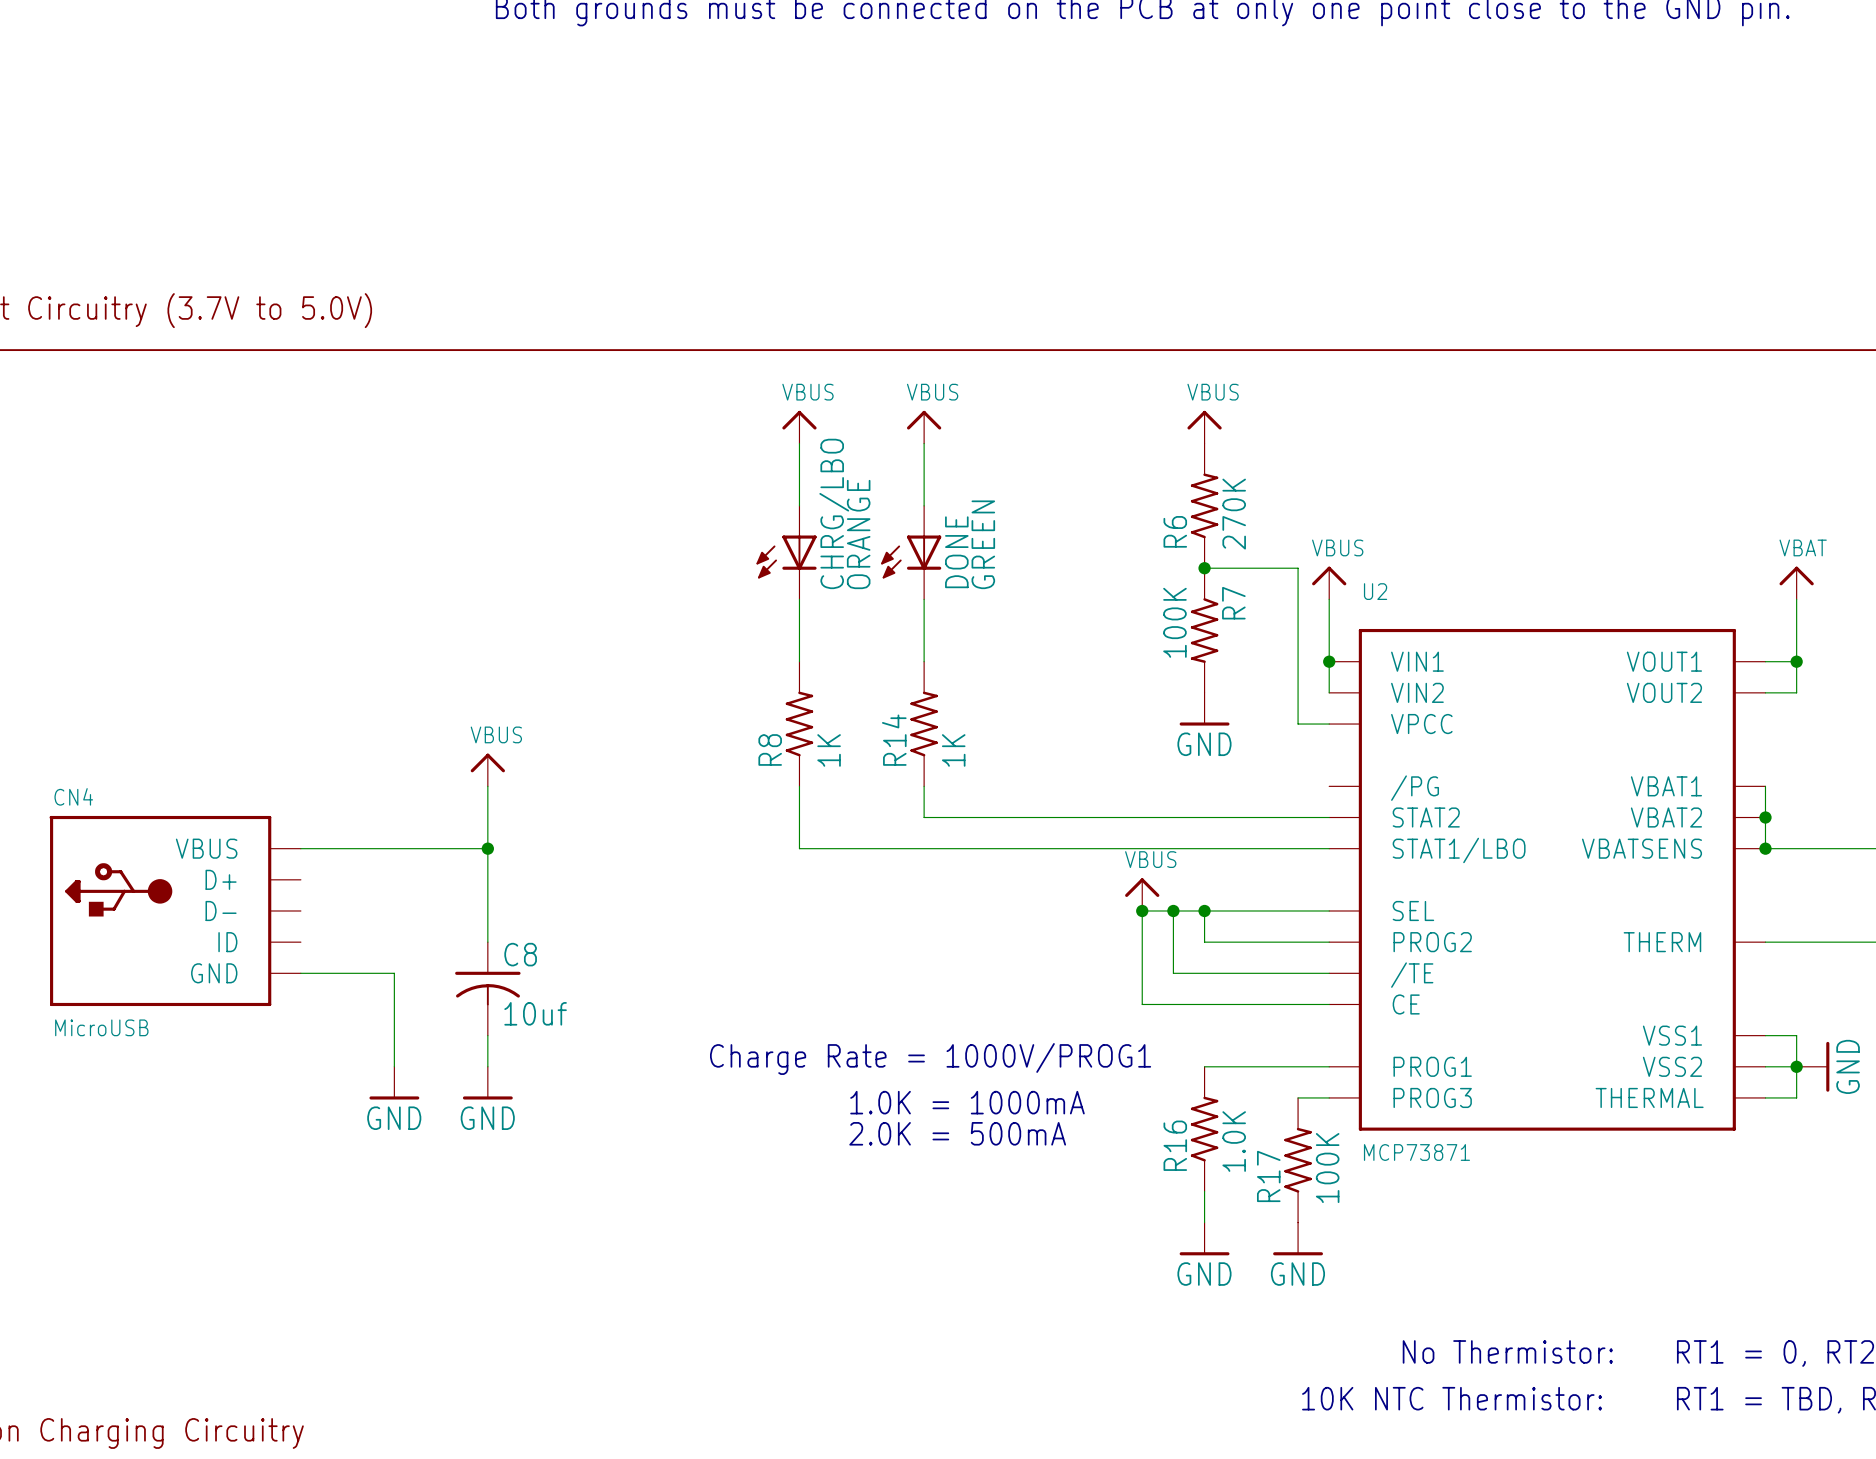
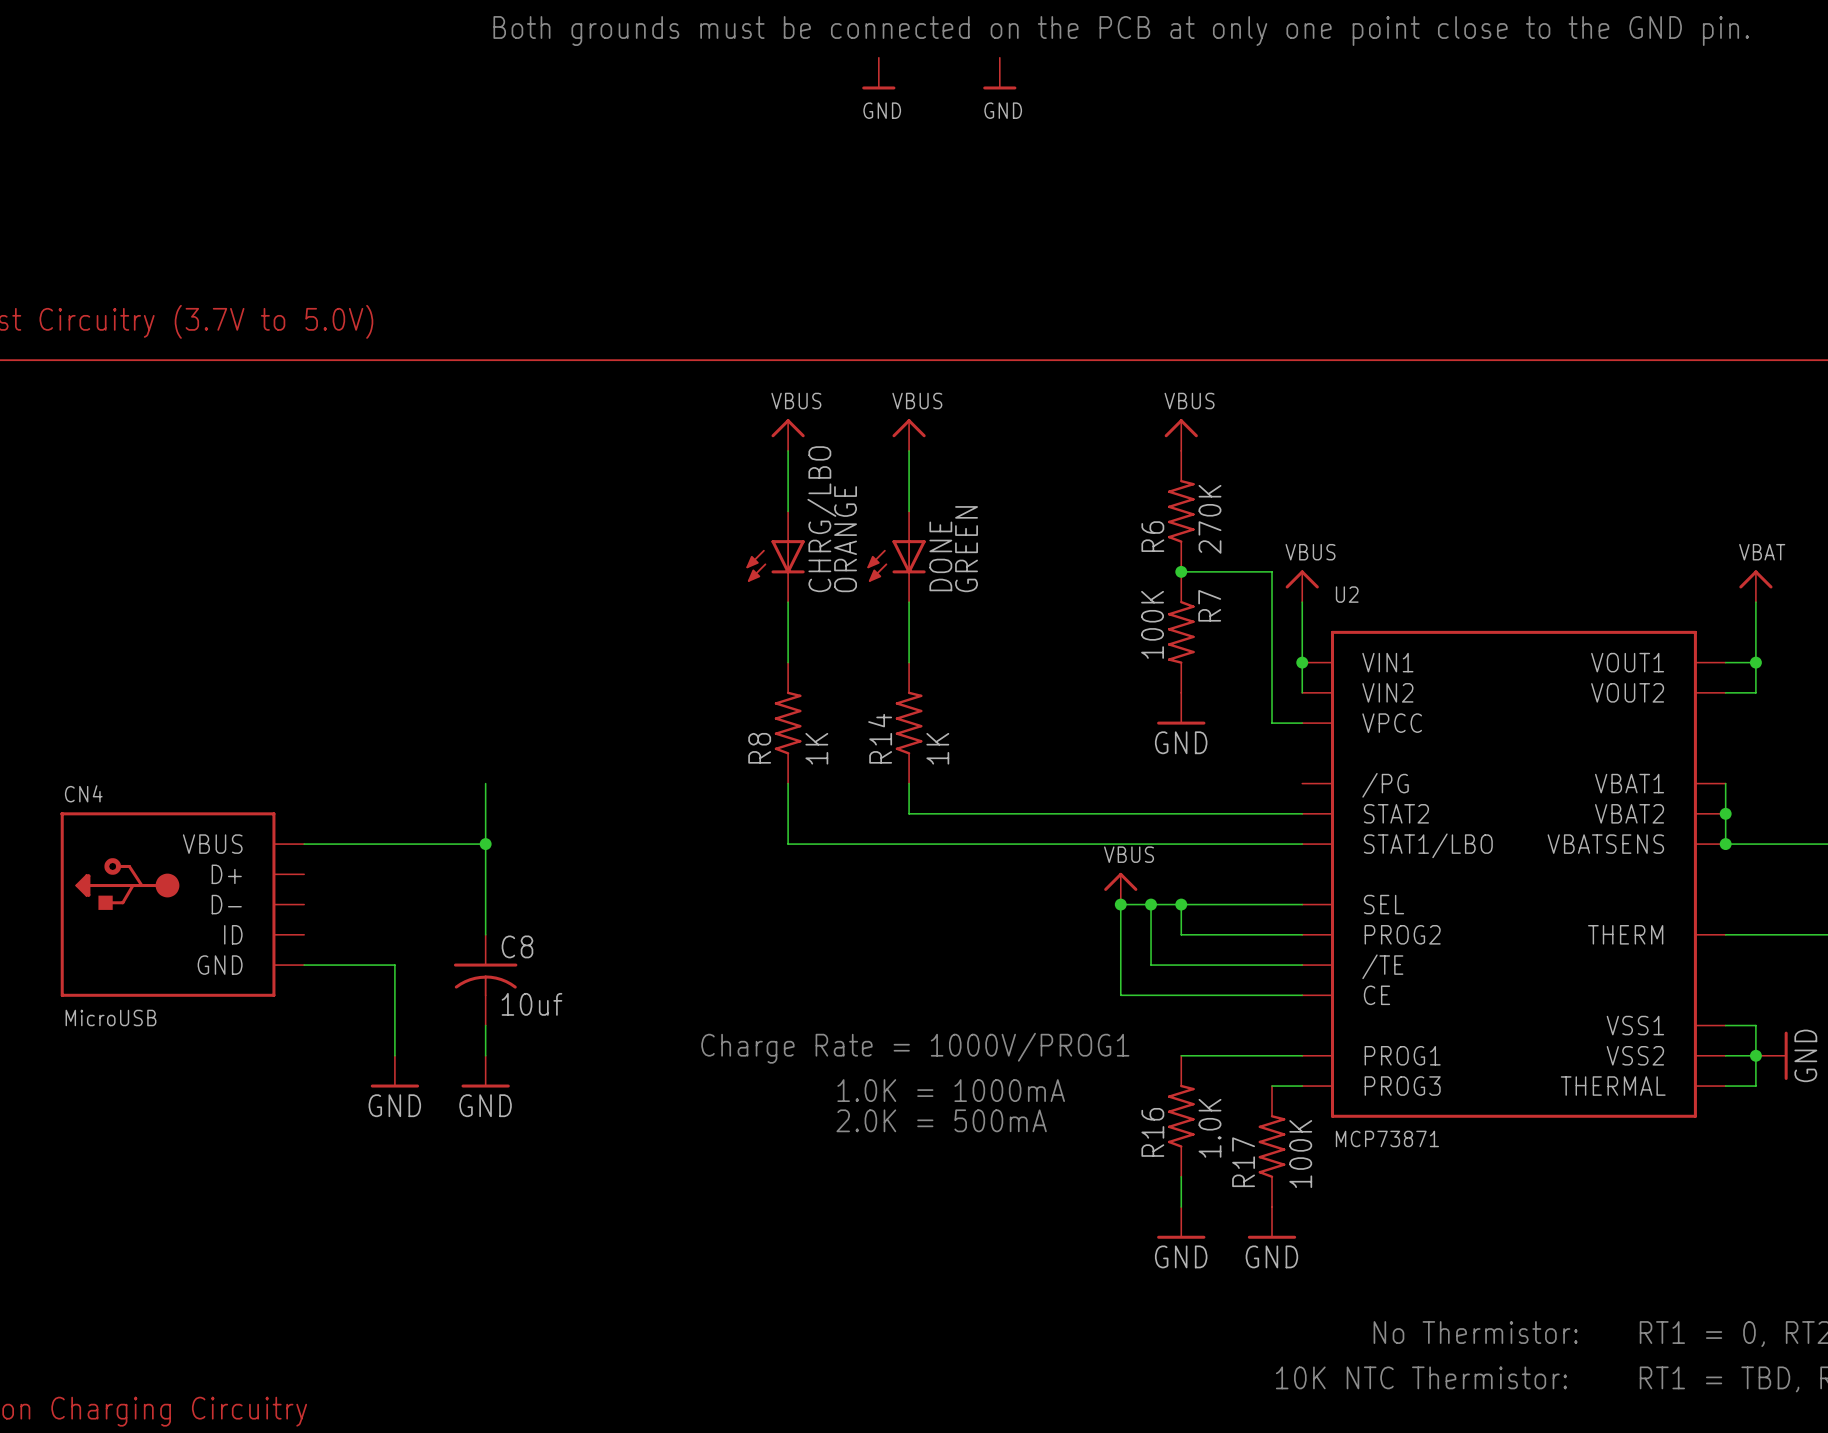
power symbol: none -> GND (878, 73)
power symbol: none -> GND (999, 73)
power symbol: VBUS (487, 769) -> none

